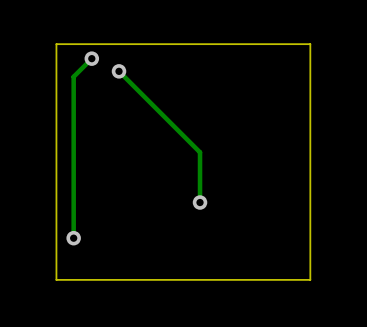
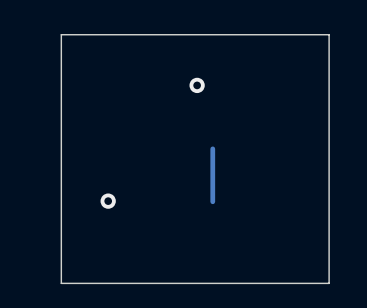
track: (91, 58) (73, 76) (73, 238) -> none
via: (91, 58) -> none
track: (119, 71) (200, 152) -> none
via: (119, 71) -> none
via: none -> (197, 85)
via: (200, 202) -> none
via position: (73, 238) -> (108, 201)

